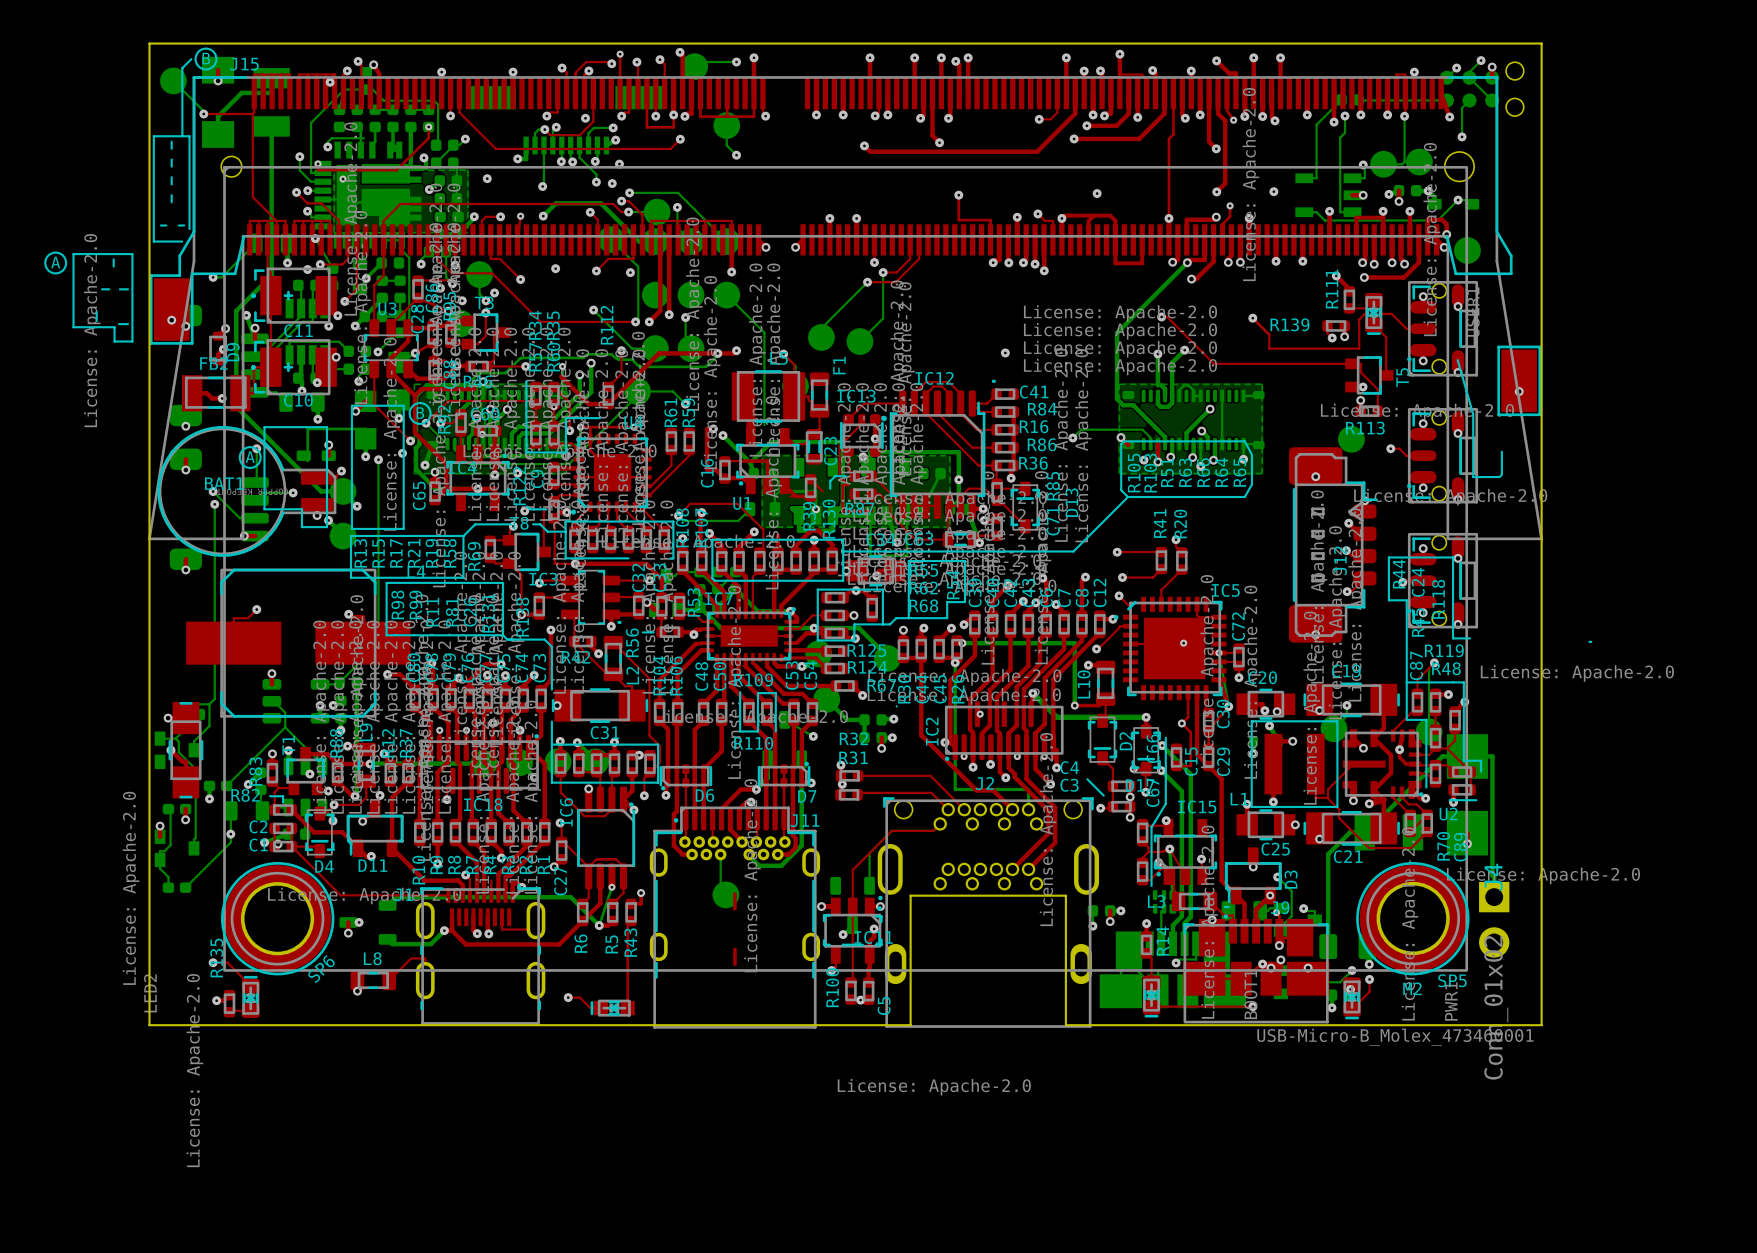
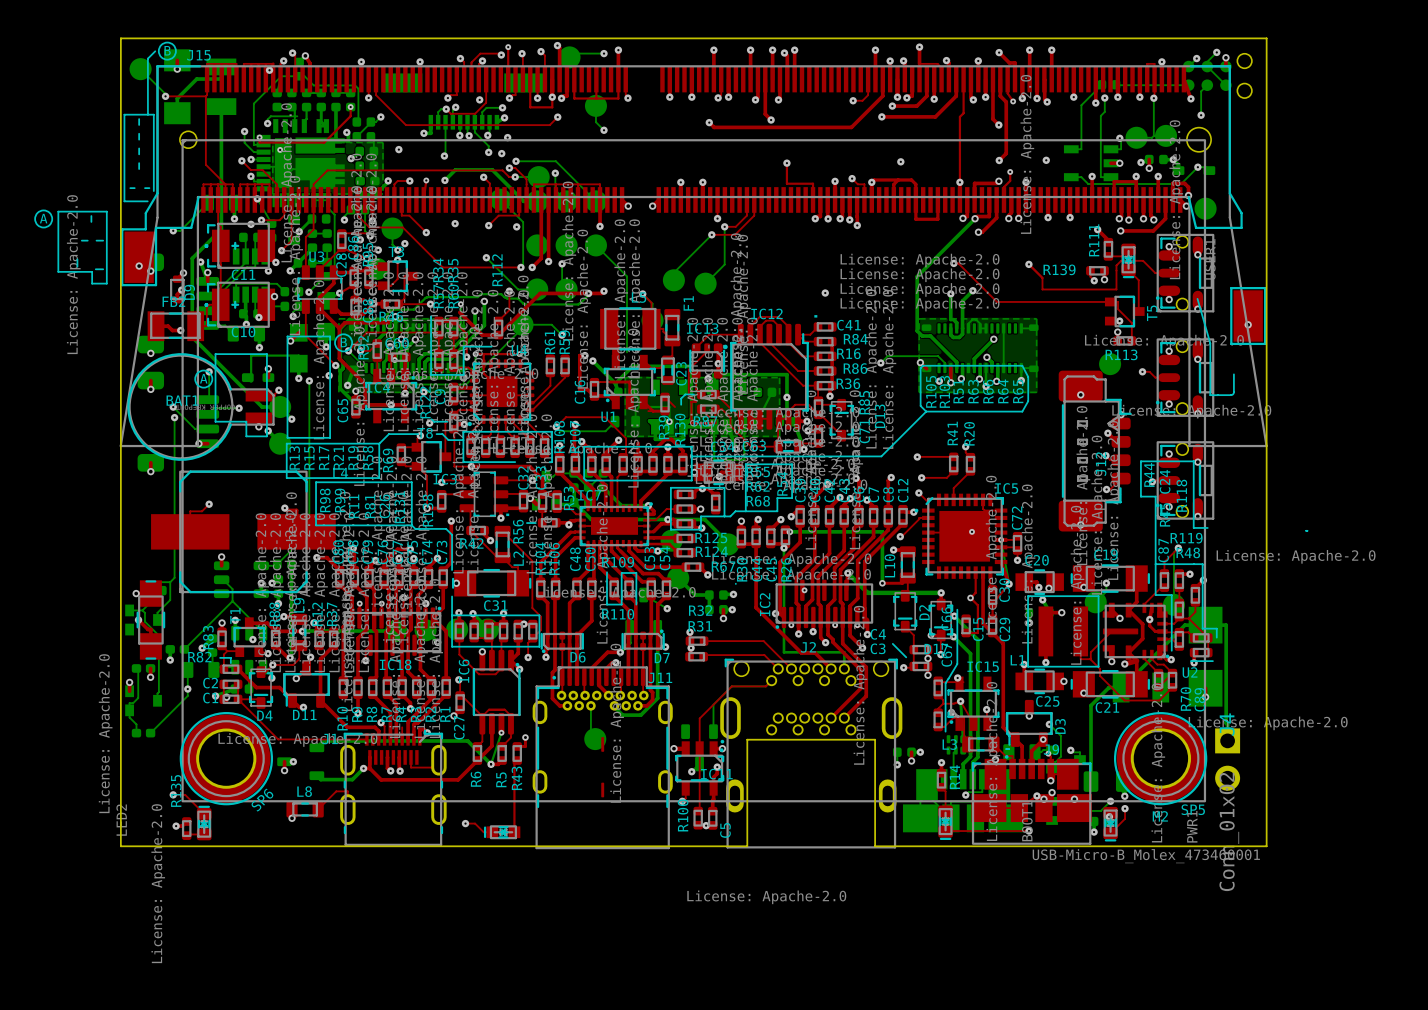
via: (553, 406) -> none

